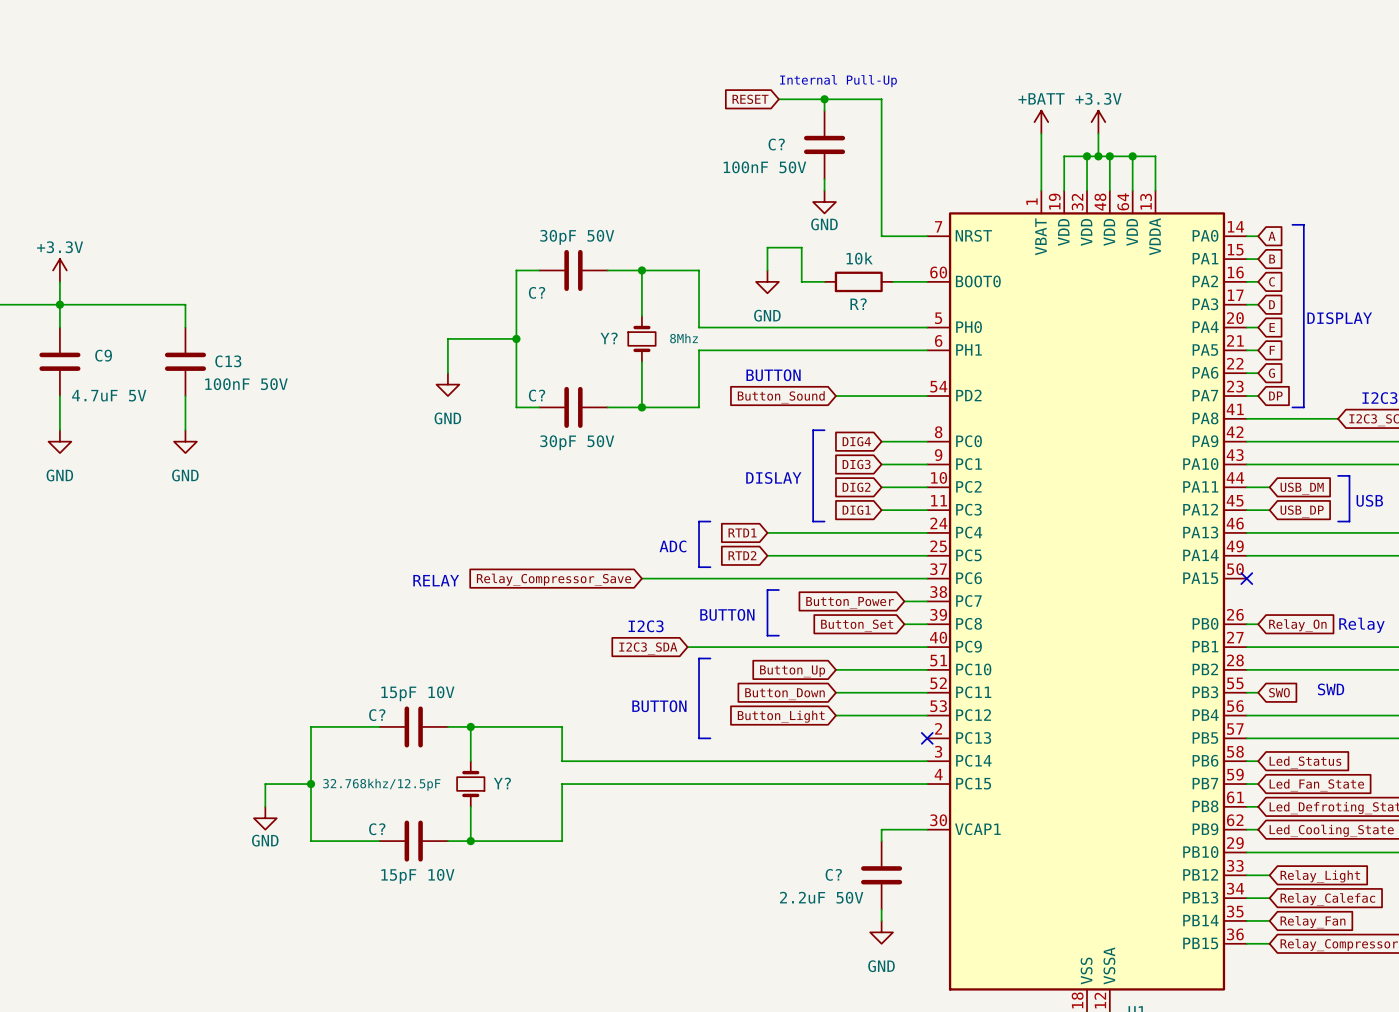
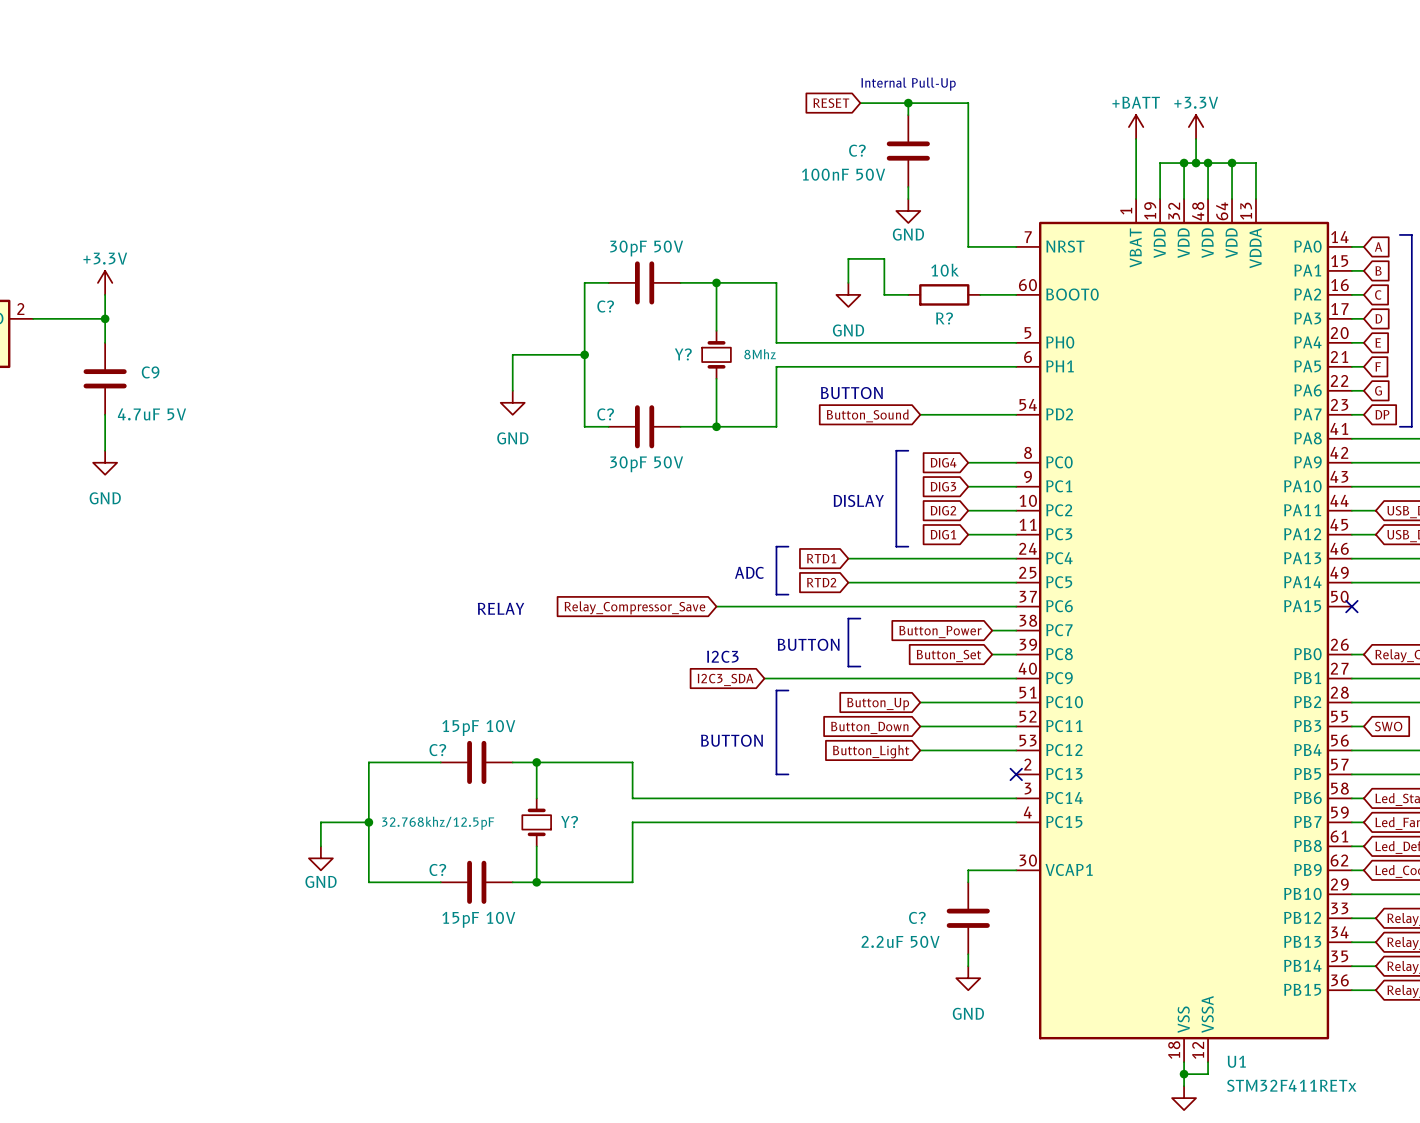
wire: (59, 304) (185, 304) (185, 327) -> none
C13: 100nF 50V (185, 361) -> none
wire: (185, 396) (185, 430) -> none
power symbol: GND (185, 441) -> none

